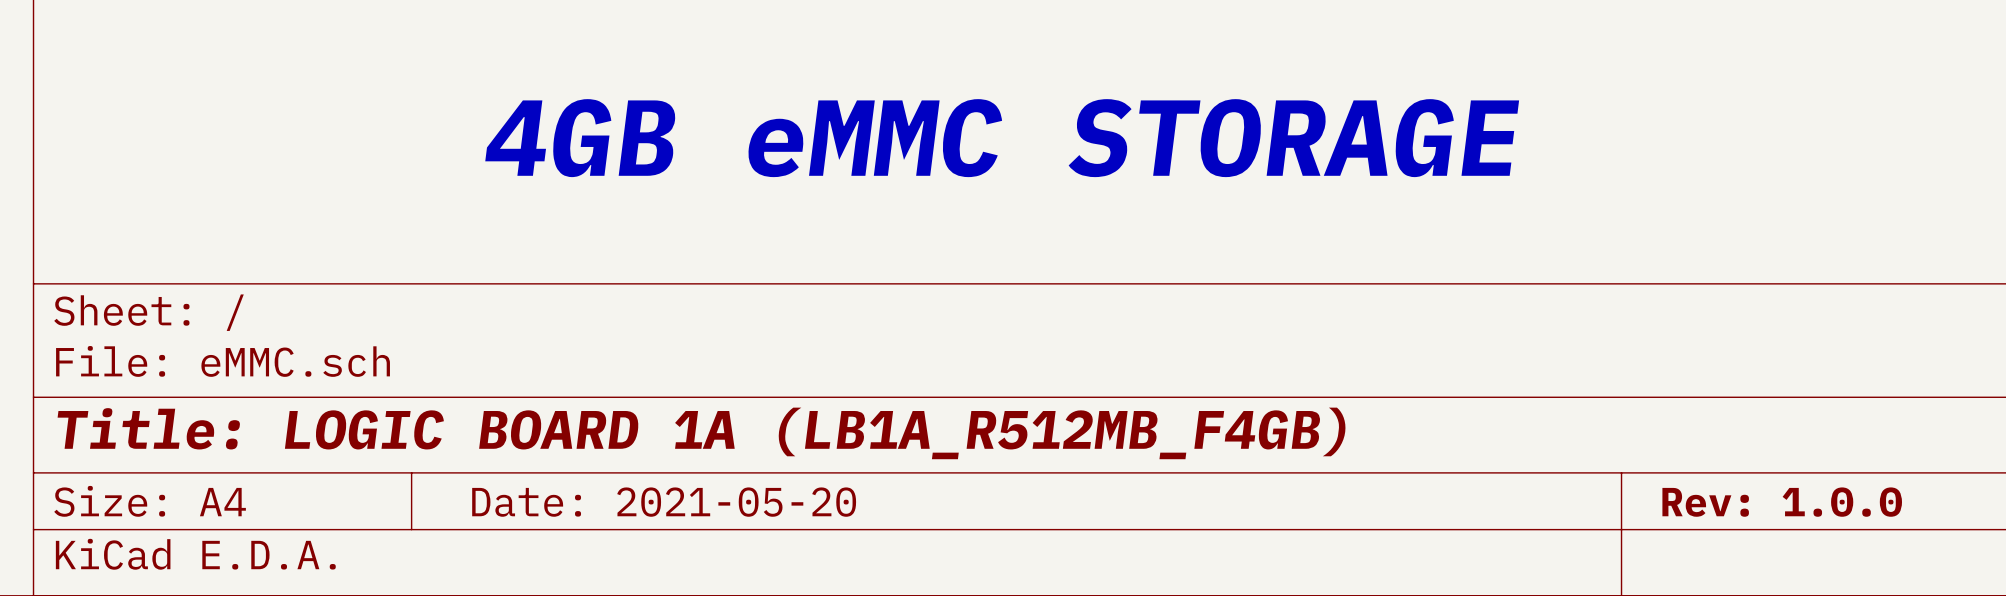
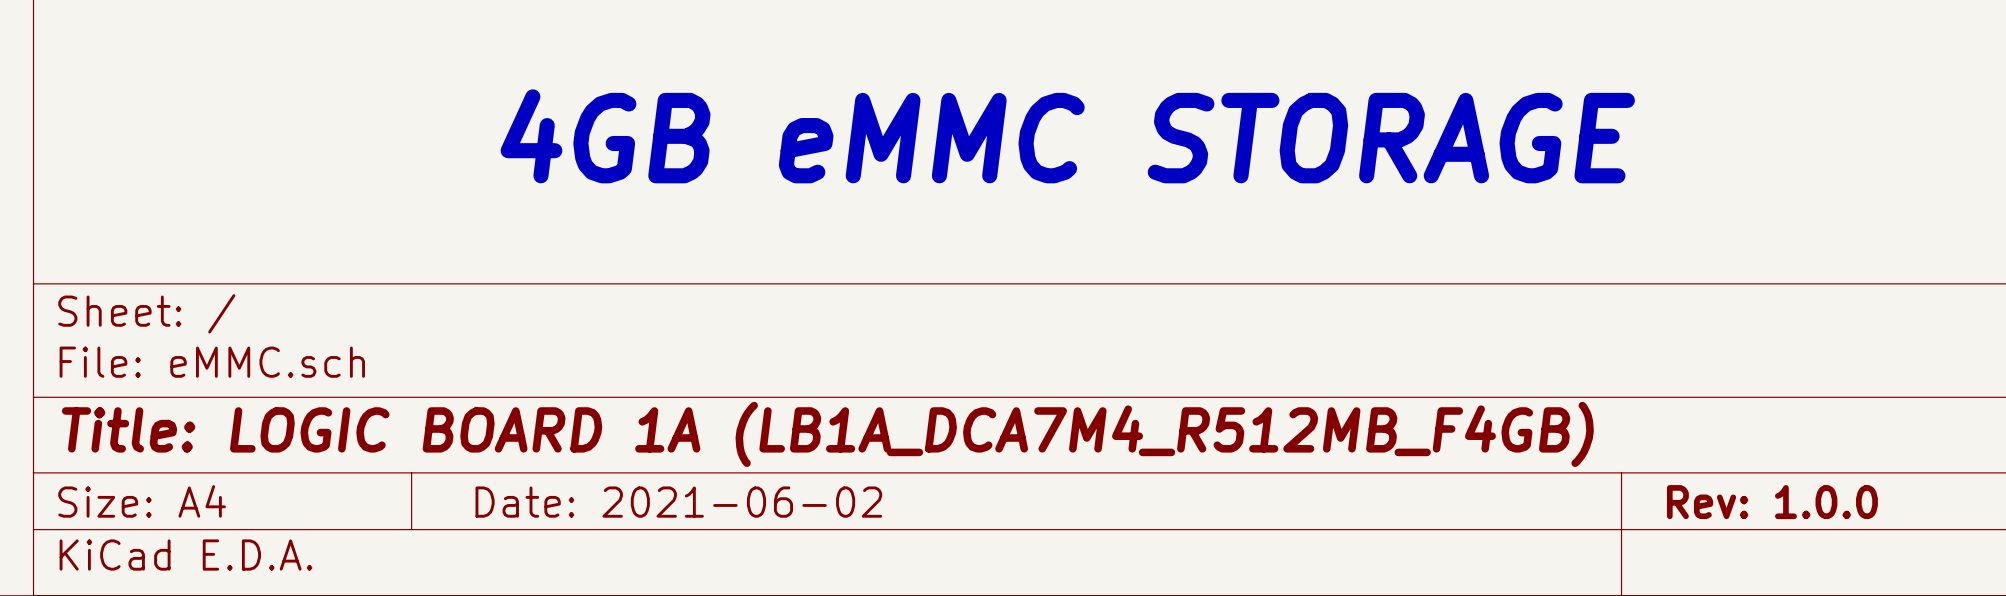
title block: Title: LOGIC BOARD 1A (LB1A_R512MB_F4GB) (701, 433) -> Title: LOGIC BOARD 1A (LB1A_DCA7M4_R512MB_F4GB) (827, 434)
title block: Date: 2021-05-20 (664, 502) -> Date: 2021-06-02 (678, 502)

